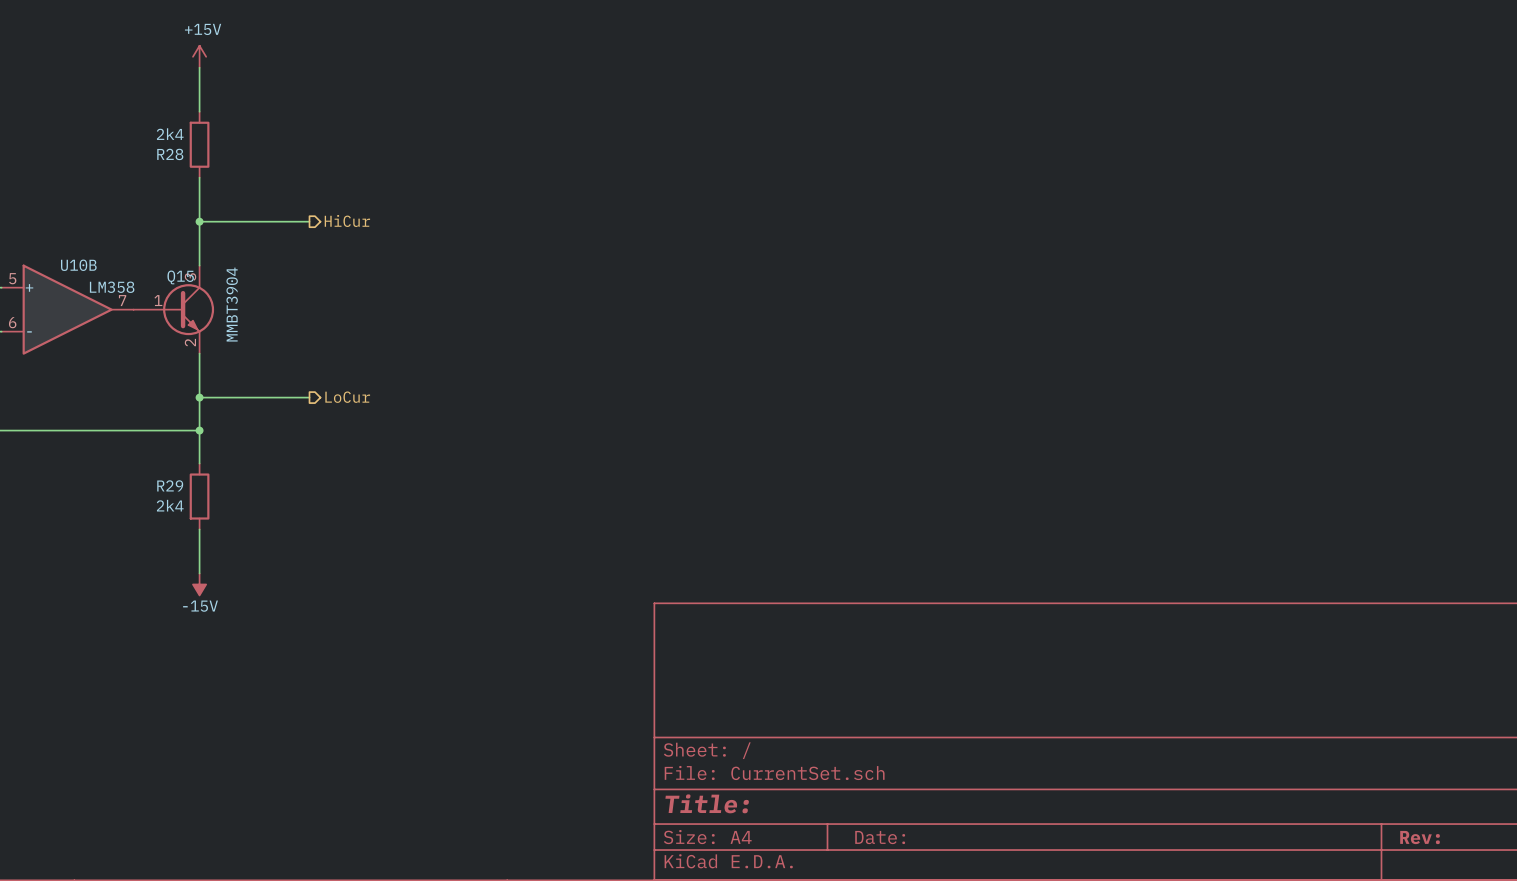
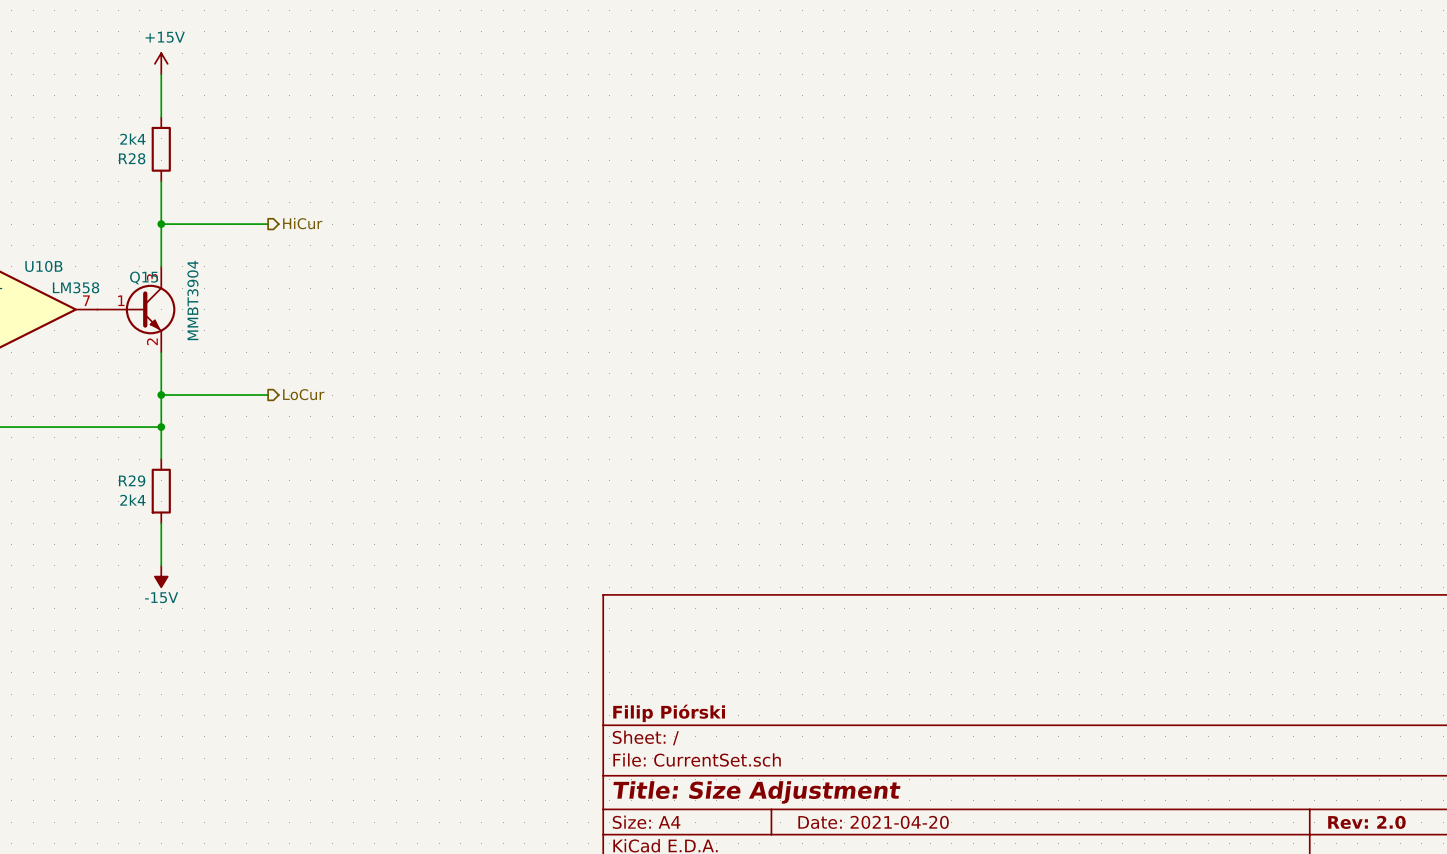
title block: none -> Filip Piórski (669, 713)
title block: Title: (707, 803) -> Title: Size Adjustment (756, 792)
title block: Date: (880, 837) -> Date: 2021-04-20 (873, 822)
title block: Rev: (1420, 837) -> Rev: 2.0 (1366, 822)

